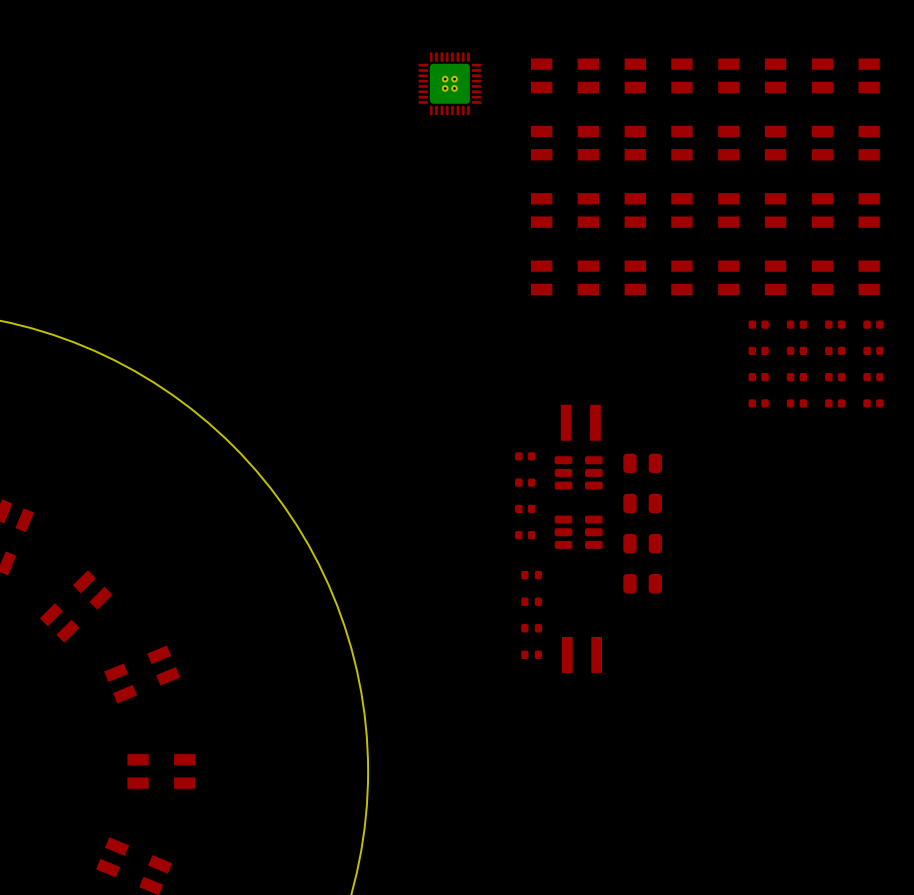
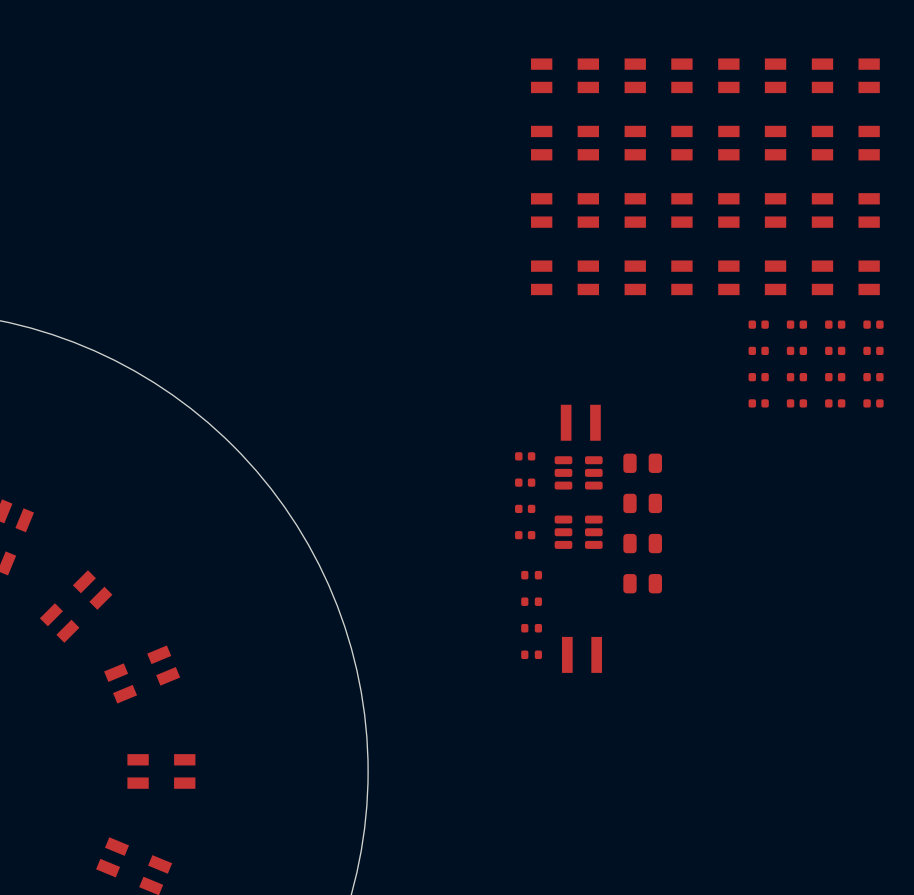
part: (449, 83) -> none

